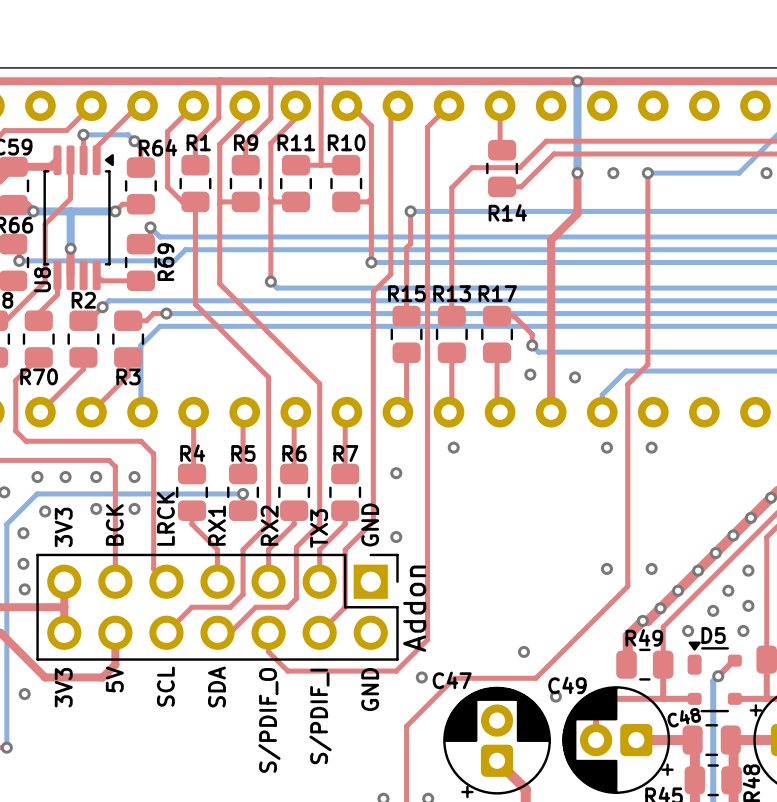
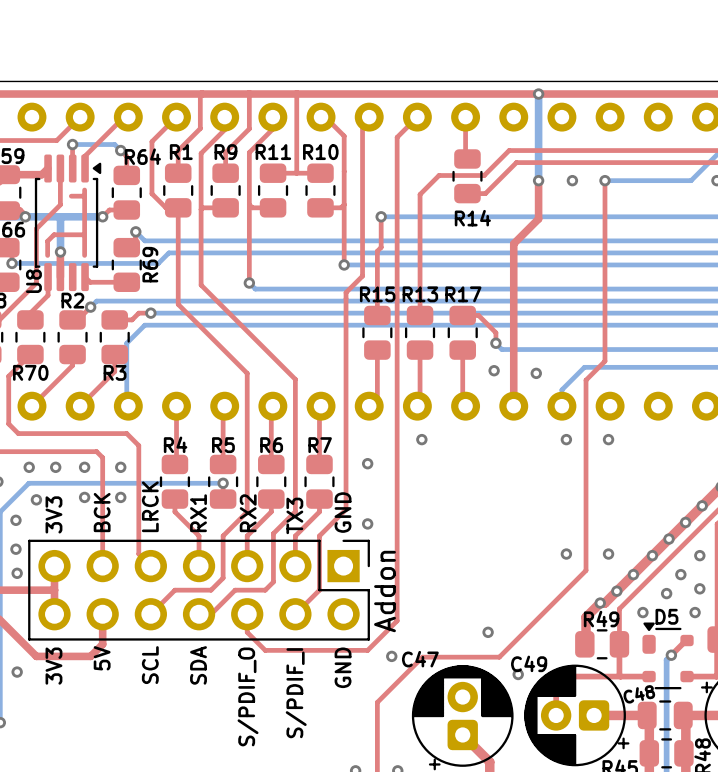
top track: none -> (84, 190) (84, 255)
top track: none -> (71, 196) (84, 196)
top track: none -> (84, 234) (54, 234) (47, 241) (47, 255)

